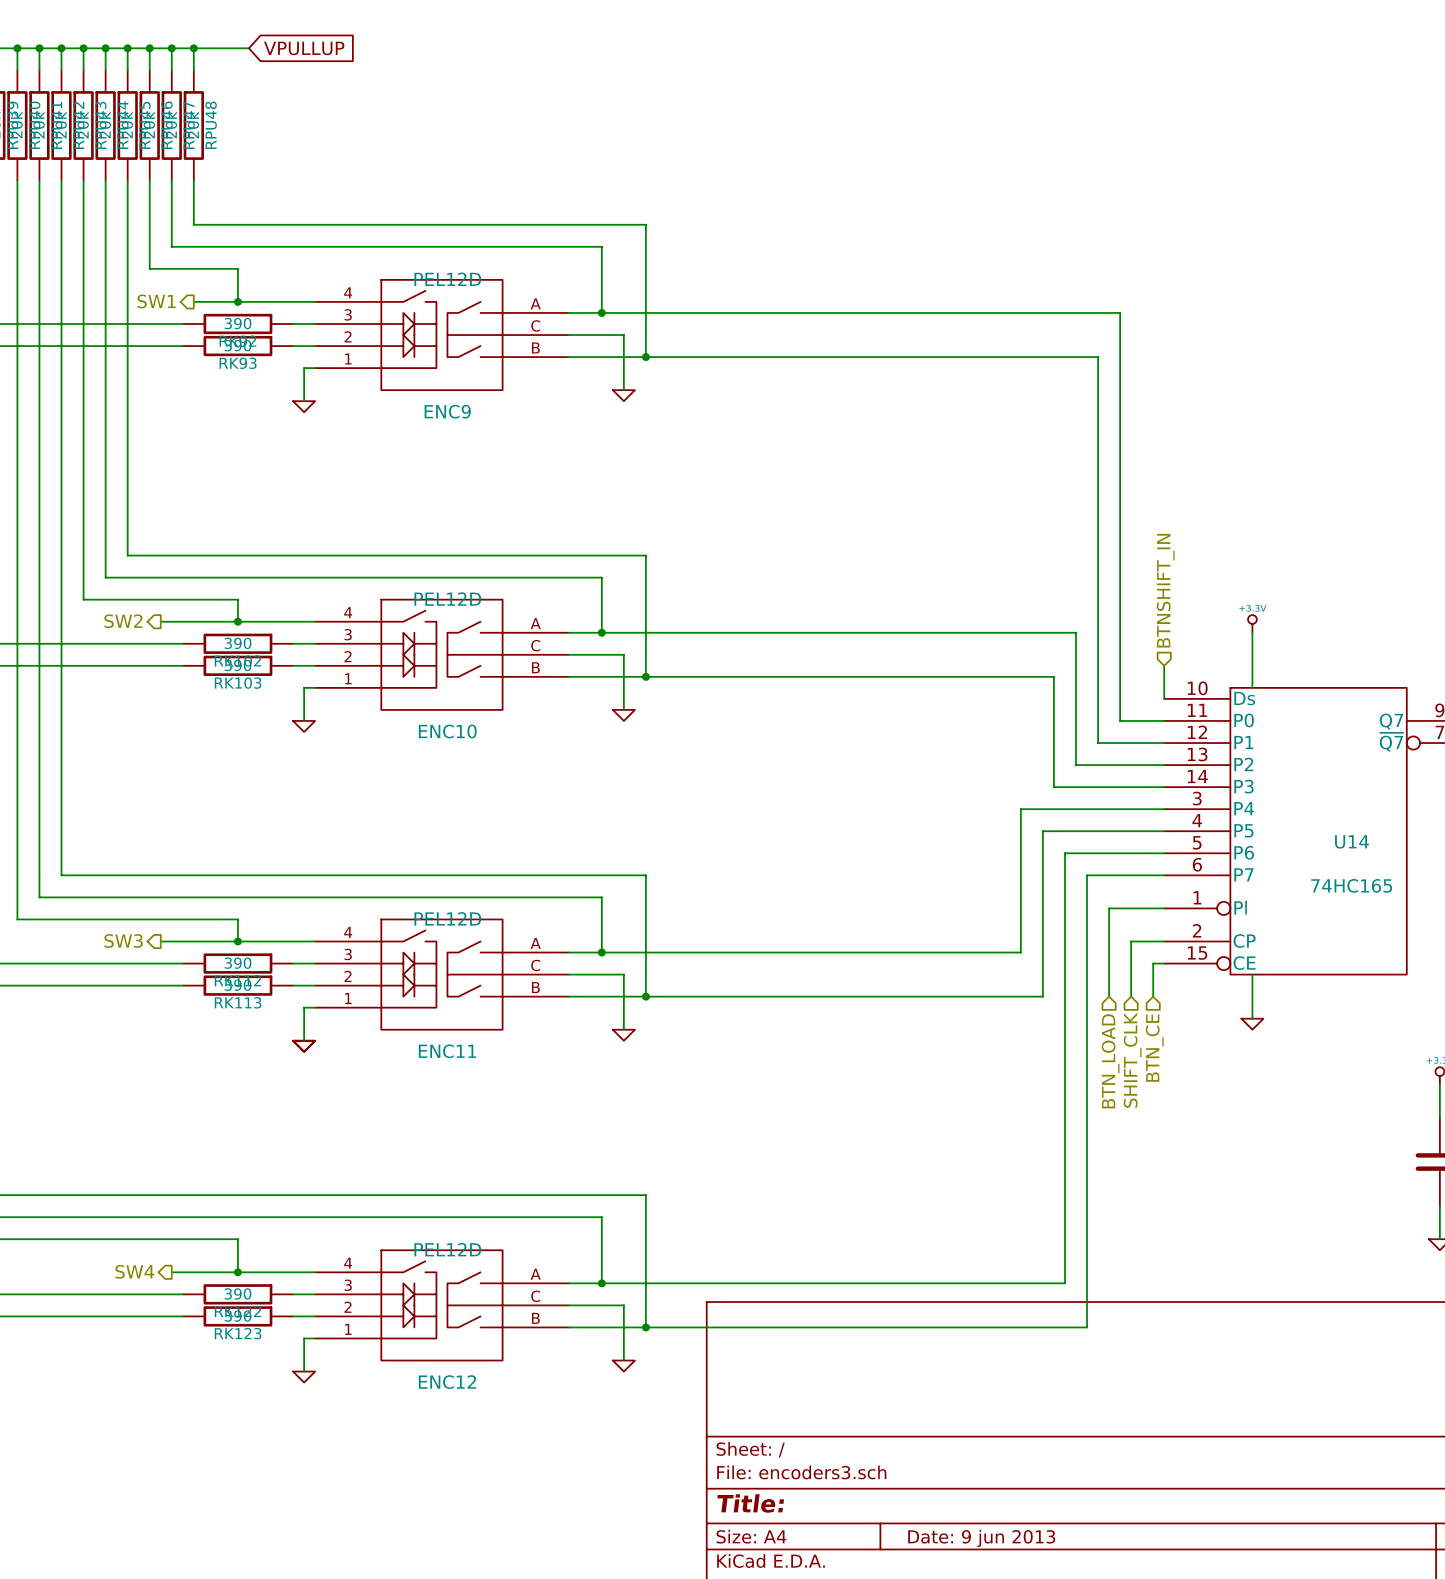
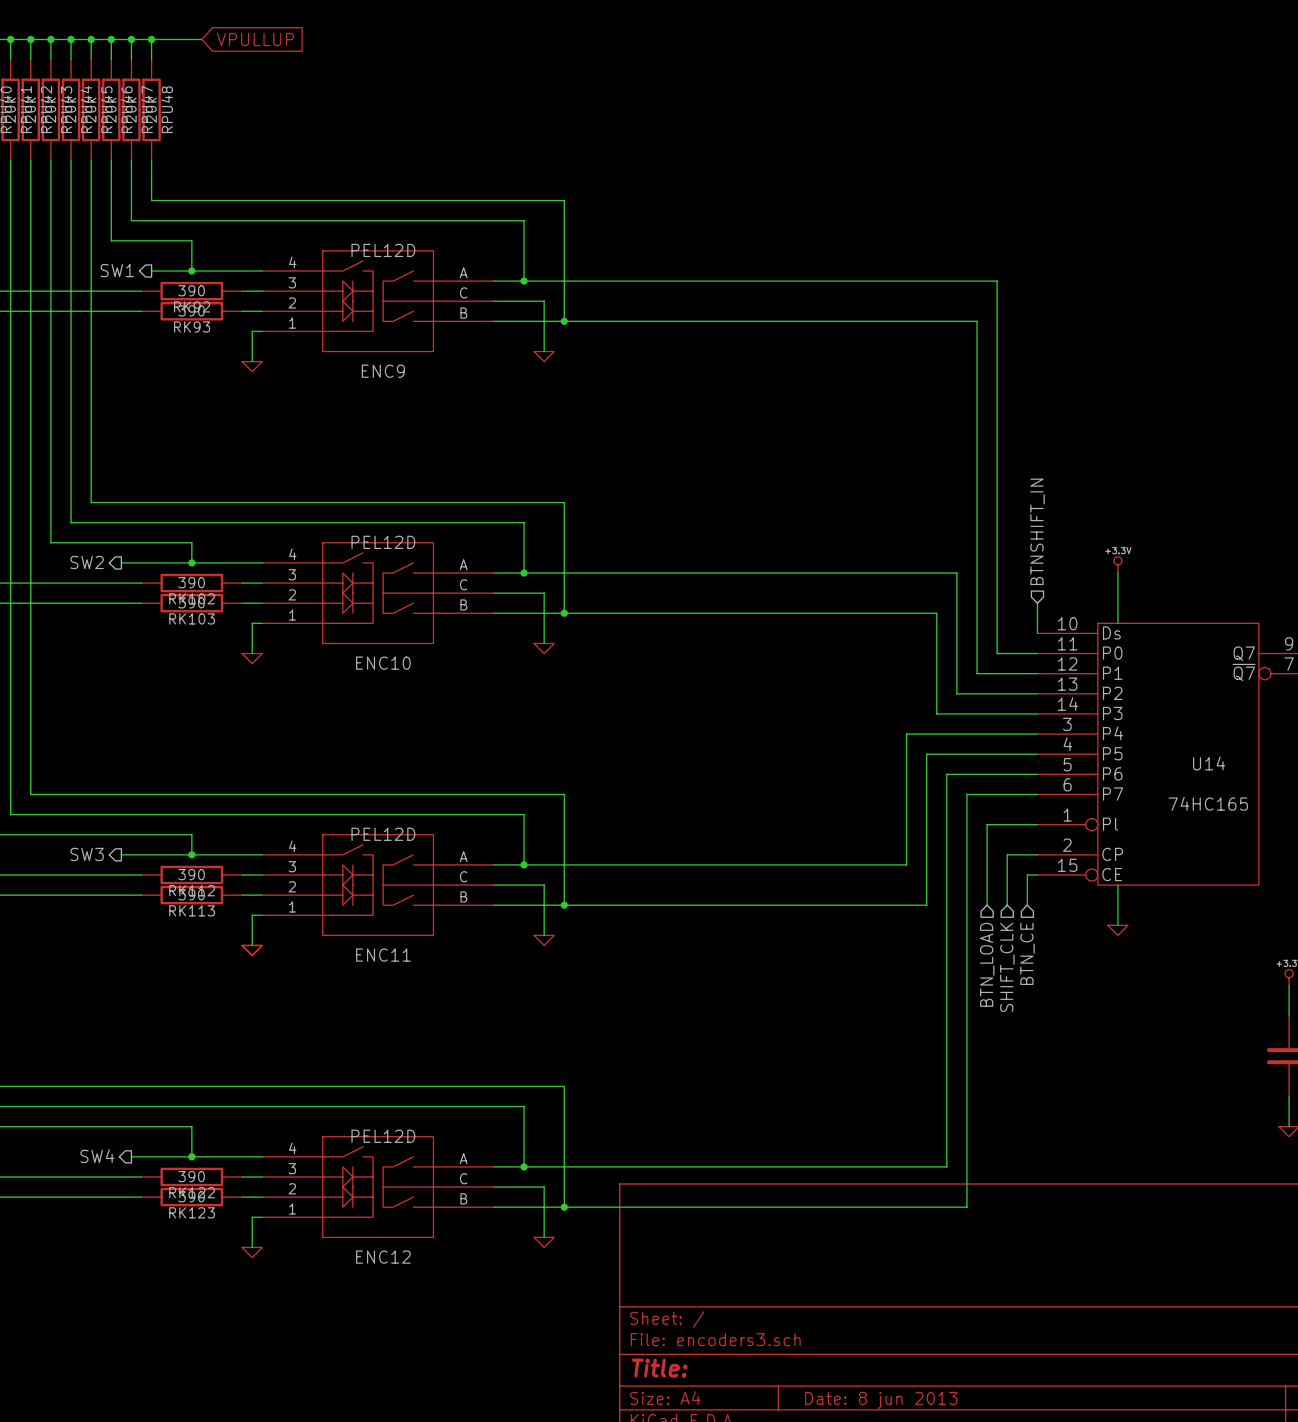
title block: Date: 9 jun 2013 (981, 1538) -> Date: 8 jun 2013 (881, 1400)

